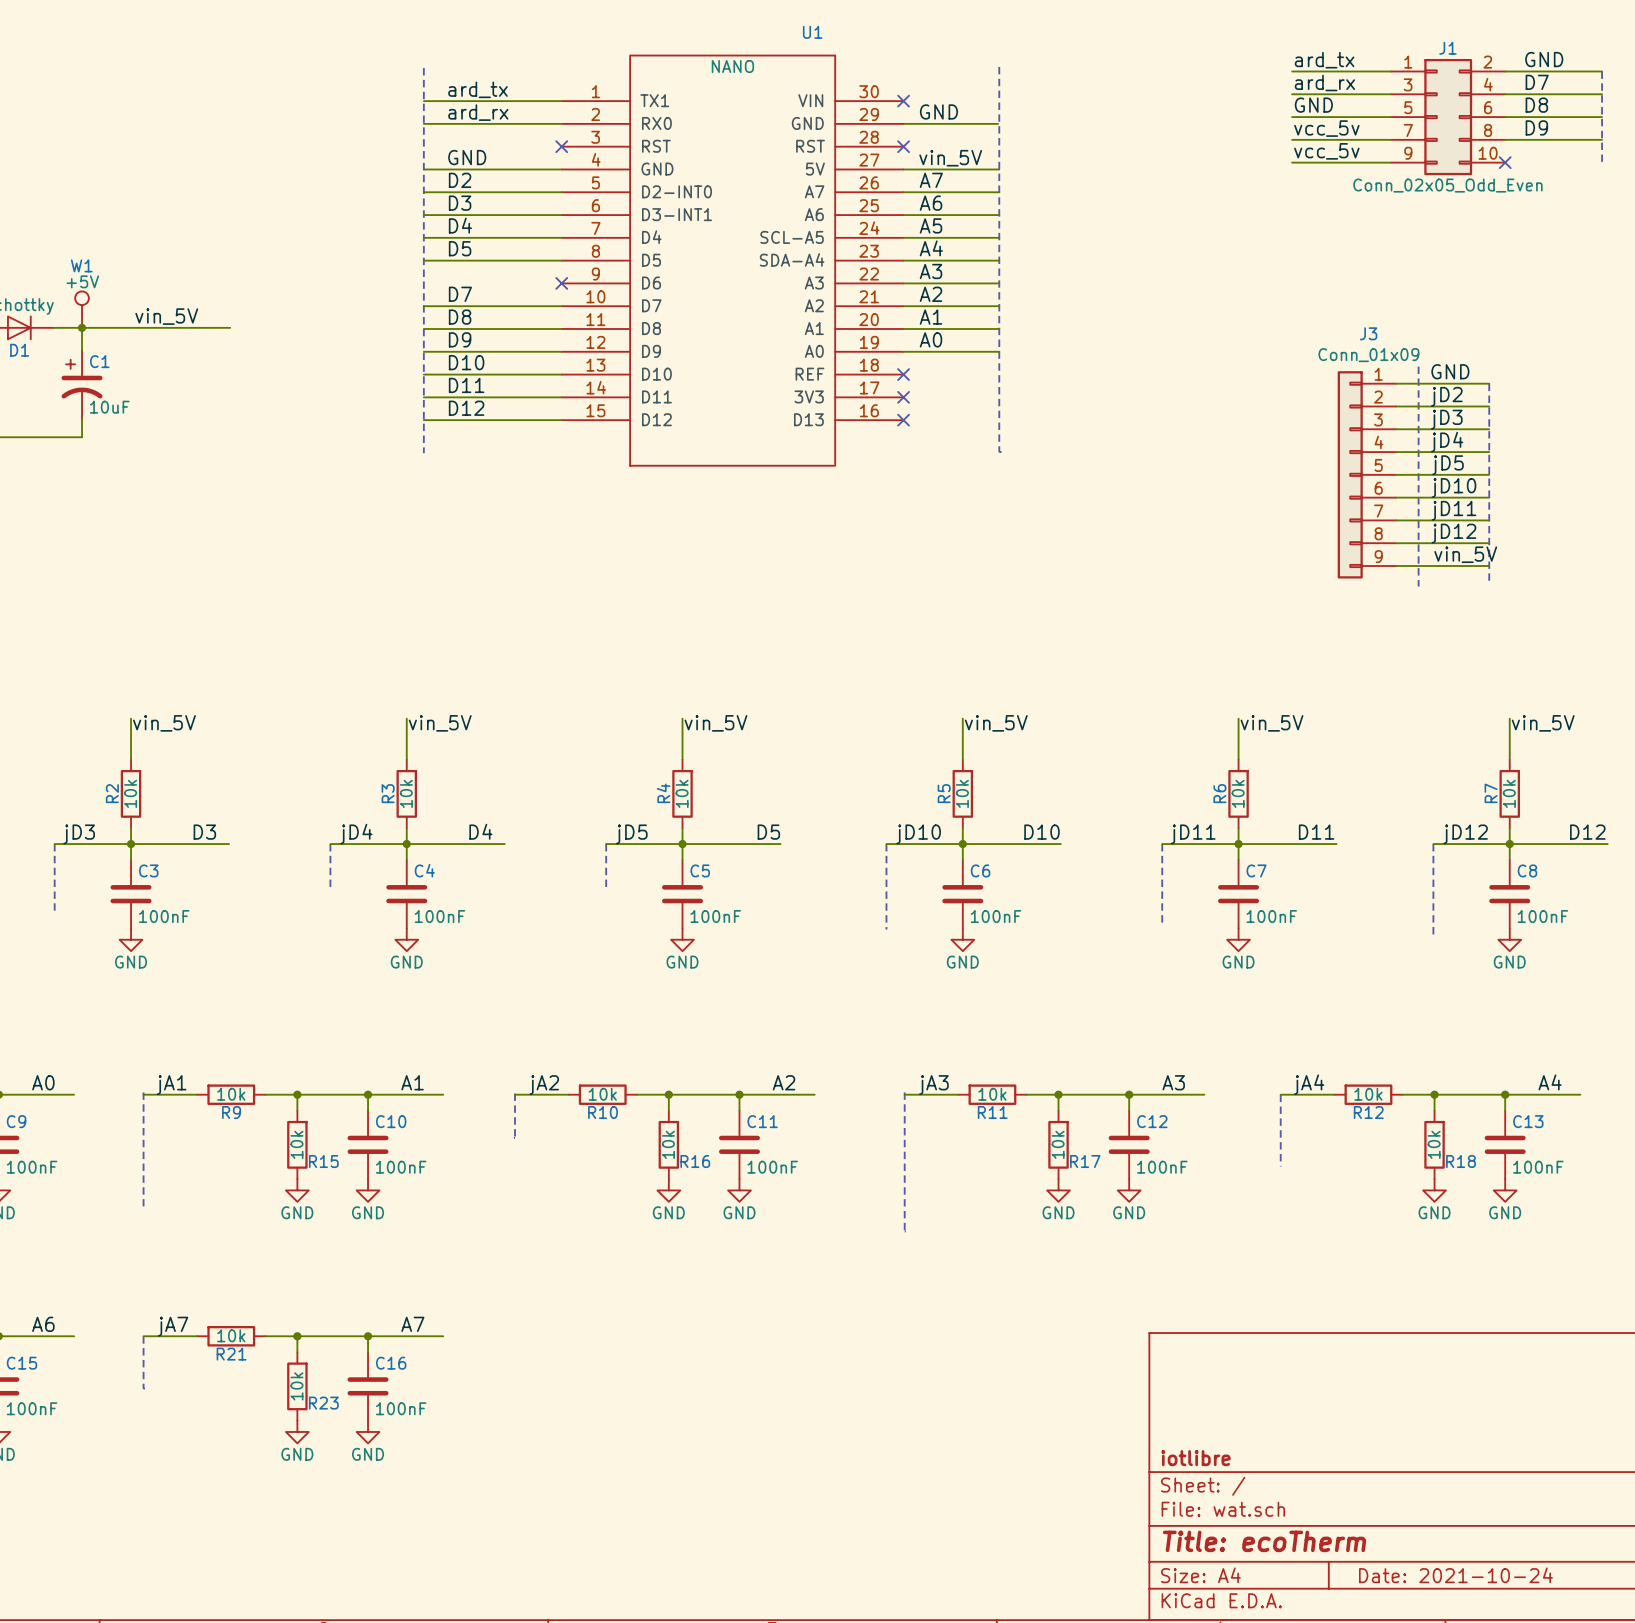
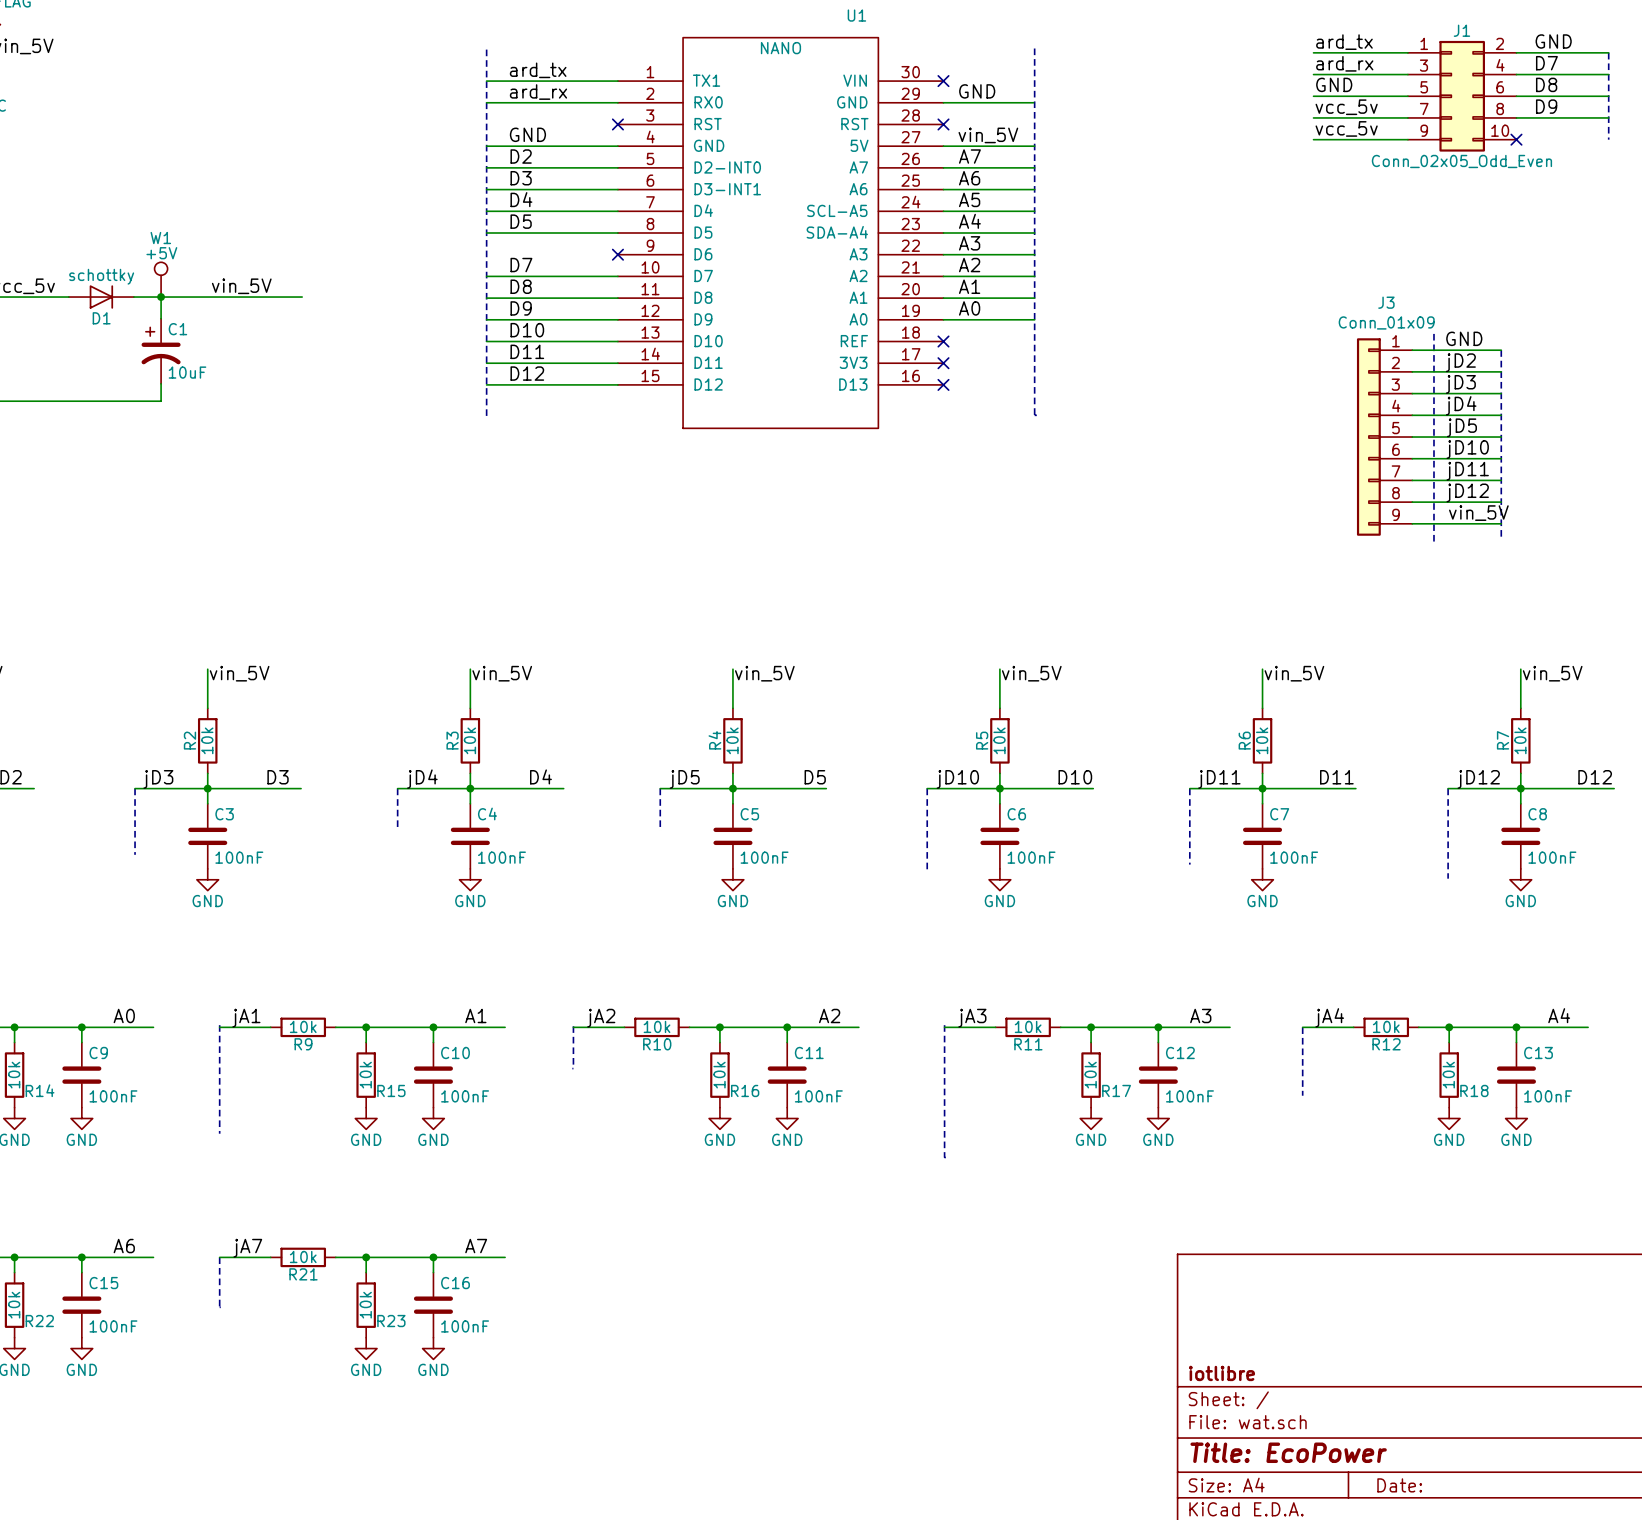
title block: Title: ecoTherm (1264, 1541) -> Title: EcoPower (1288, 1452)
title block: Date: 2021-10-24 (1455, 1575) -> Date: (1399, 1485)

